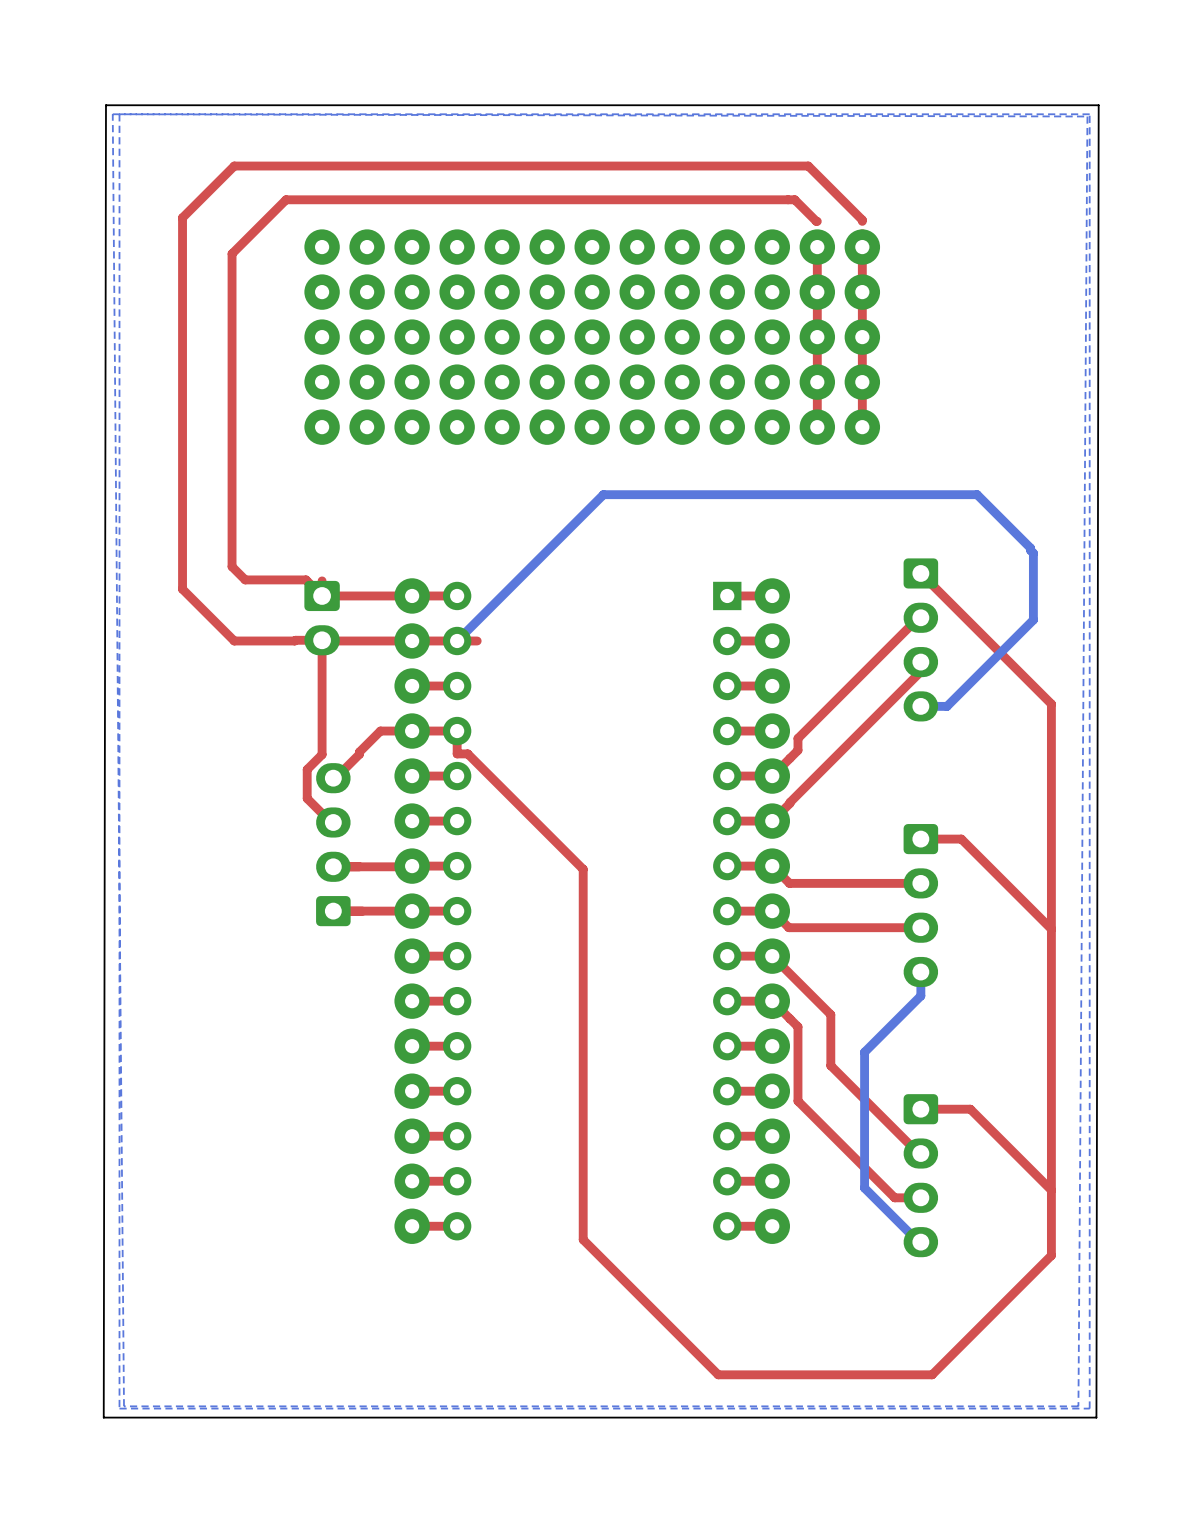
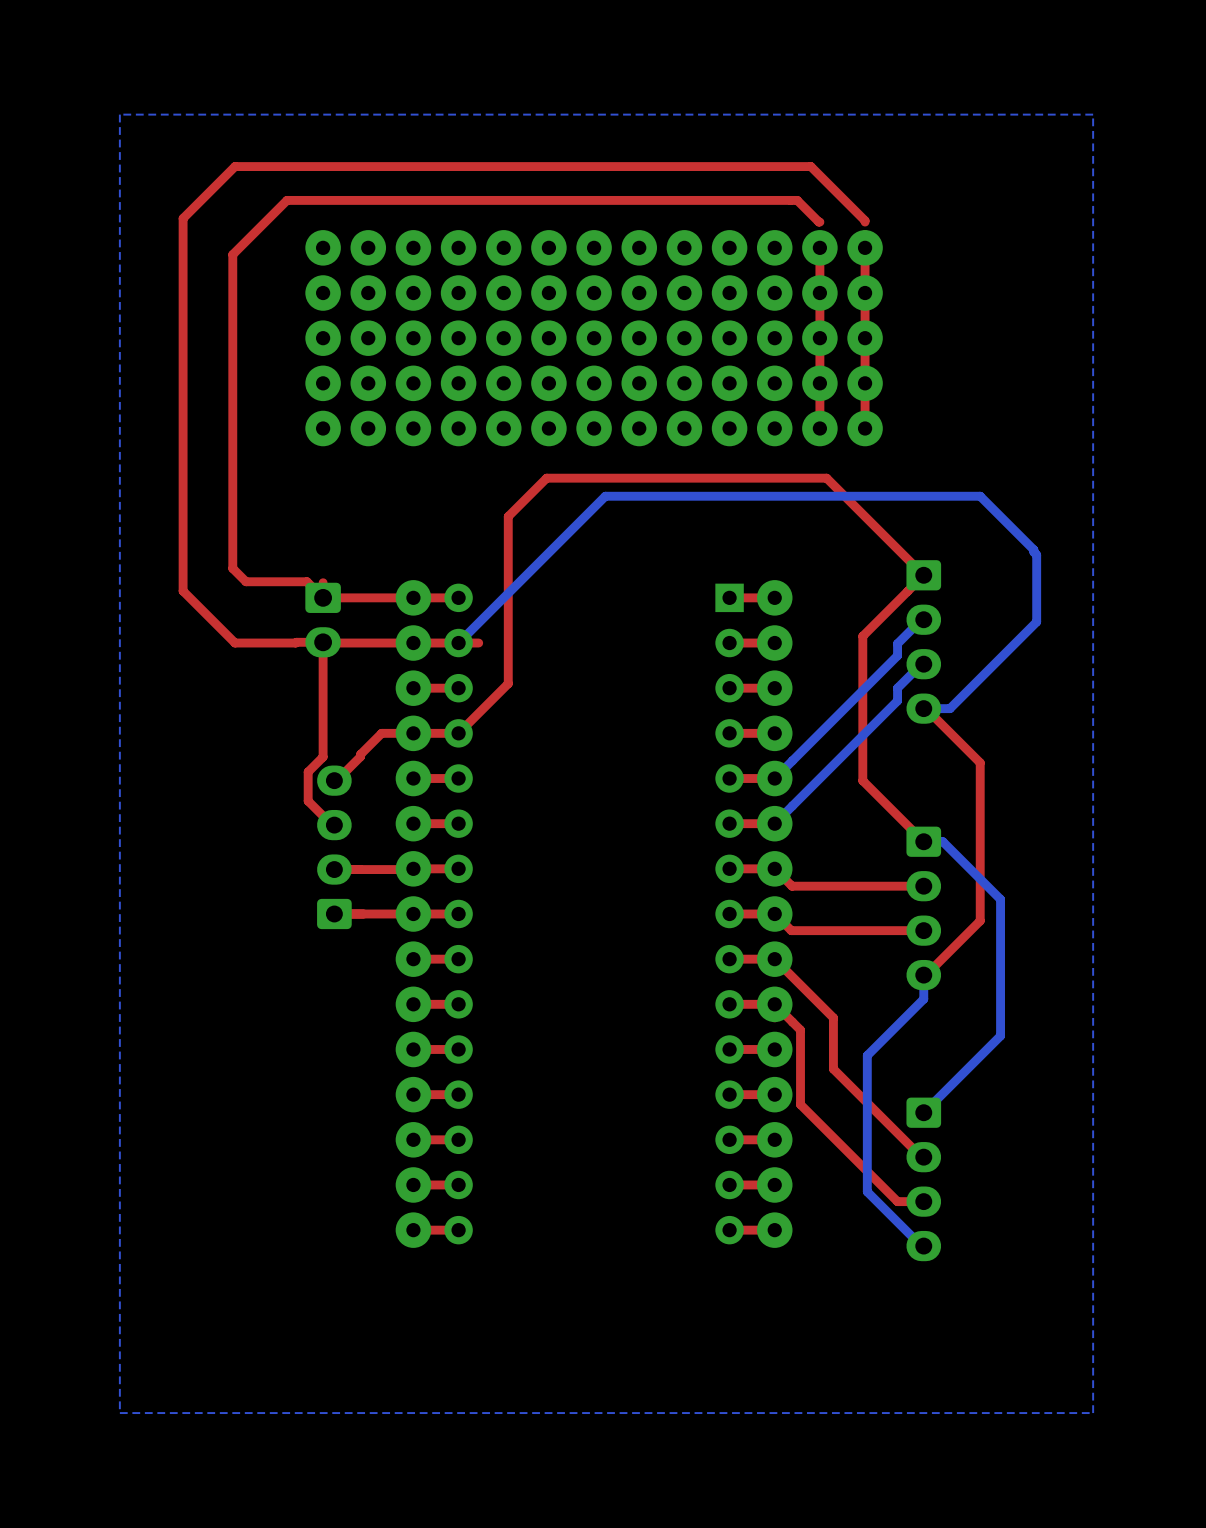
board edge: (1098, 105) (105, 105) (103, 1417) (1096, 1417) (1098, 105) -> none
bottom zone outline: (112, 114) (124, 1406) (1078, 1406) (1087, 116) (112, 114) -> none
top track: (920, 573) (1051, 704) (1051, 1255) (932, 1374) (718, 1374) (583, 1239) (583, 869) (467, 753) (457, 753) (457, 731) -> (923, 841) (862, 780) (862, 636) (923, 575) (826, 478) (546, 478) (508, 516) (508, 683) (458, 733)
bottom track: none -> (921, 619) (897, 643) (897, 655) (774, 778)
top track: (920, 617) (918, 617) (797, 738) (797, 750) (772, 776) -> none
bottom track: none -> (921, 664) (897, 688) (897, 700) (774, 823)
top track: (920, 662) (920, 671) (772, 821) -> none
top track: none -> (925, 708) (980, 762) (980, 920) (925, 975)
top track: (920, 839) (961, 839) (1051, 929) -> none
bottom track: none -> (923, 841) (942, 841) (1000, 899) (1000, 1035) (923, 1112)
top track: (920, 1109) (970, 1109) (1051, 1190) -> none

